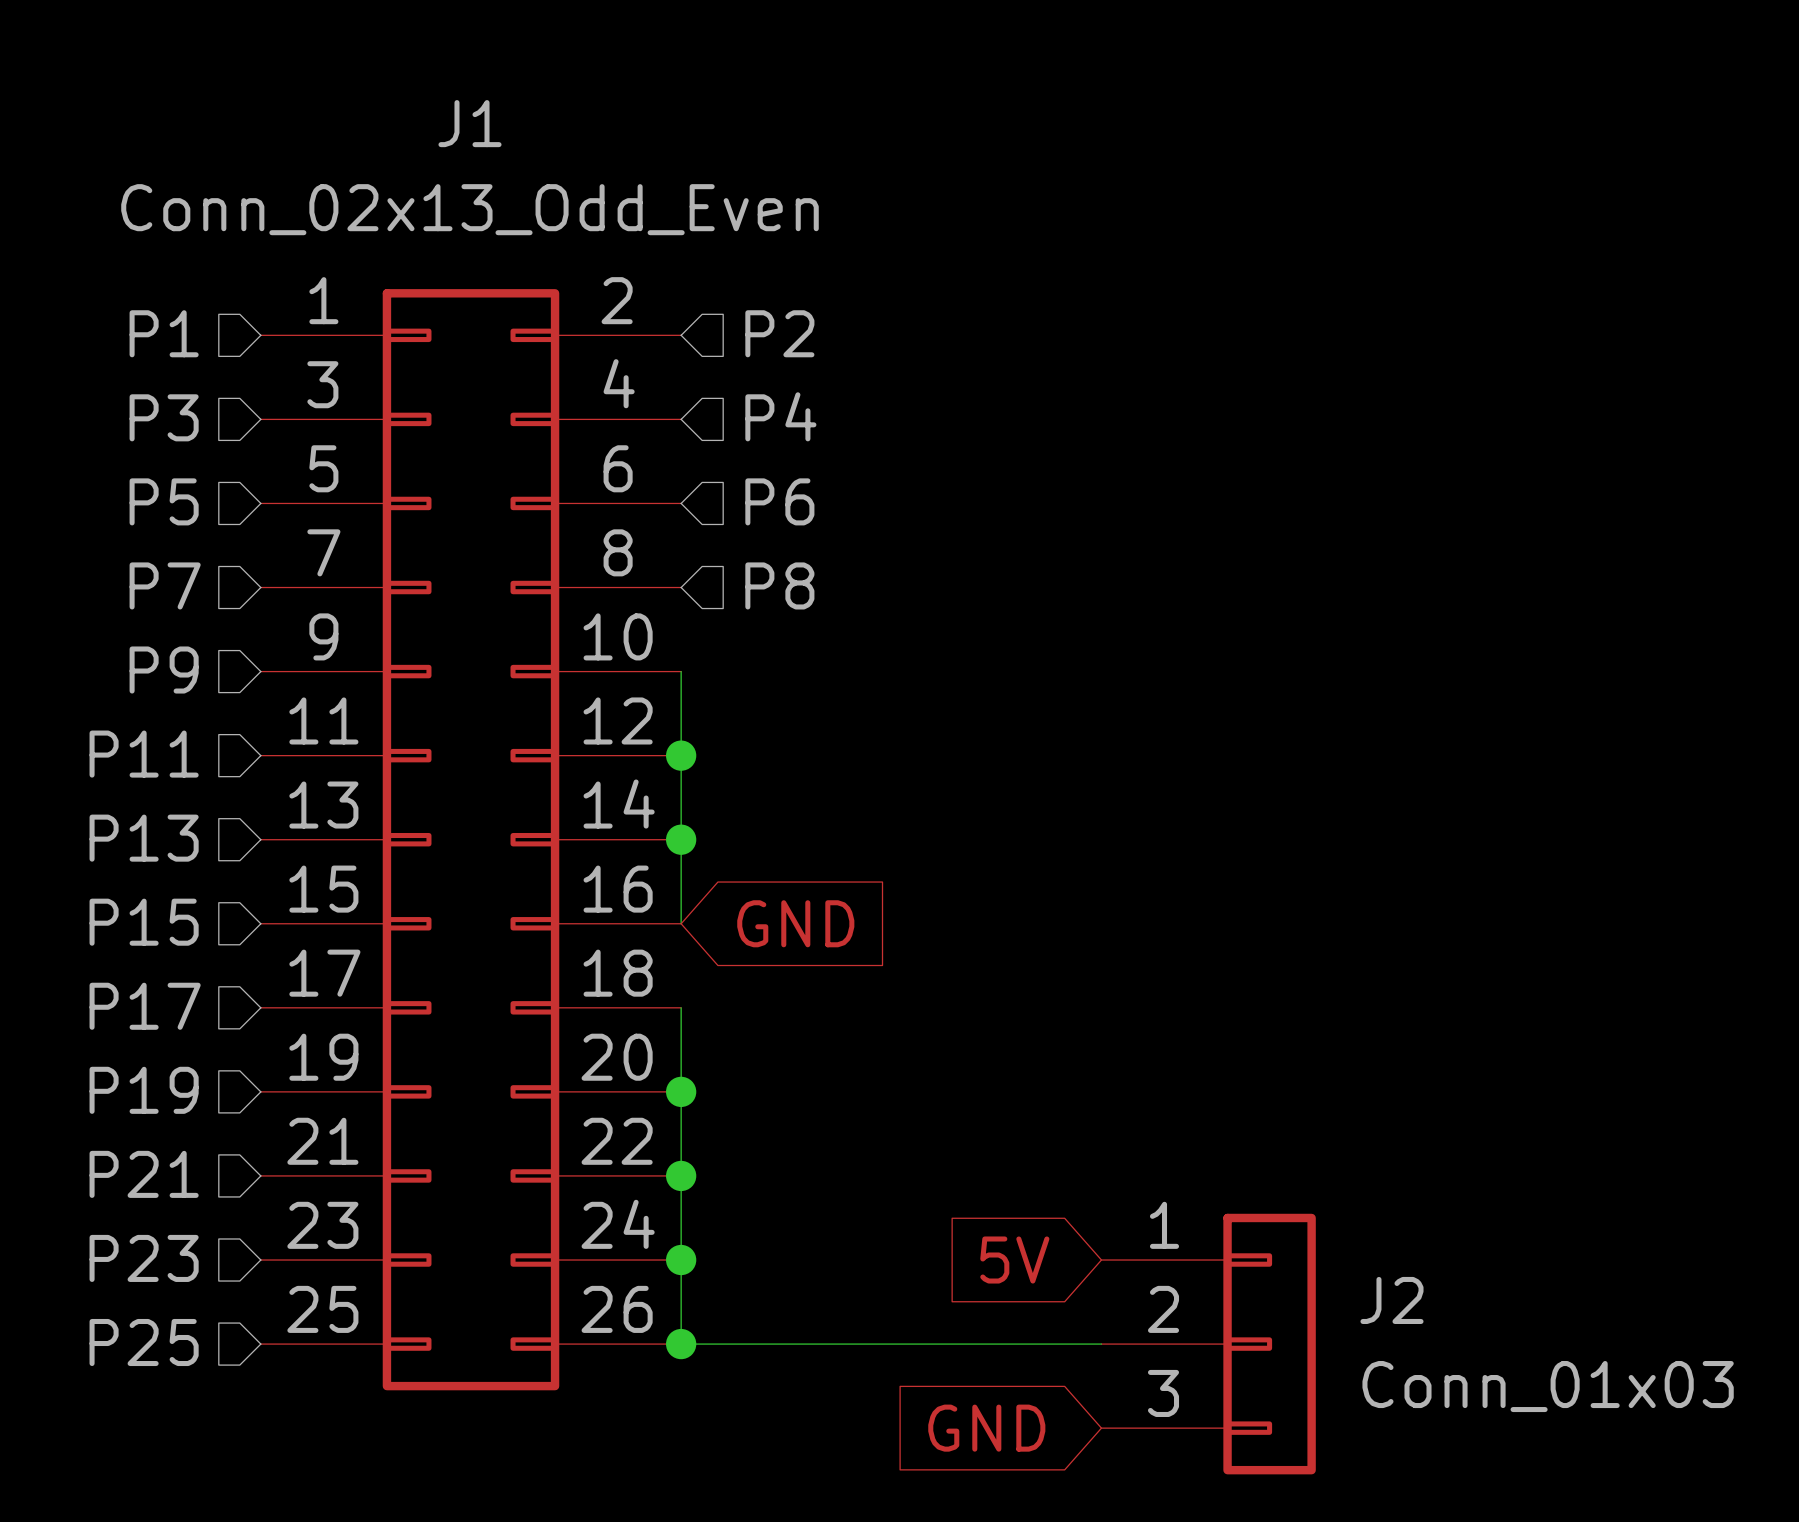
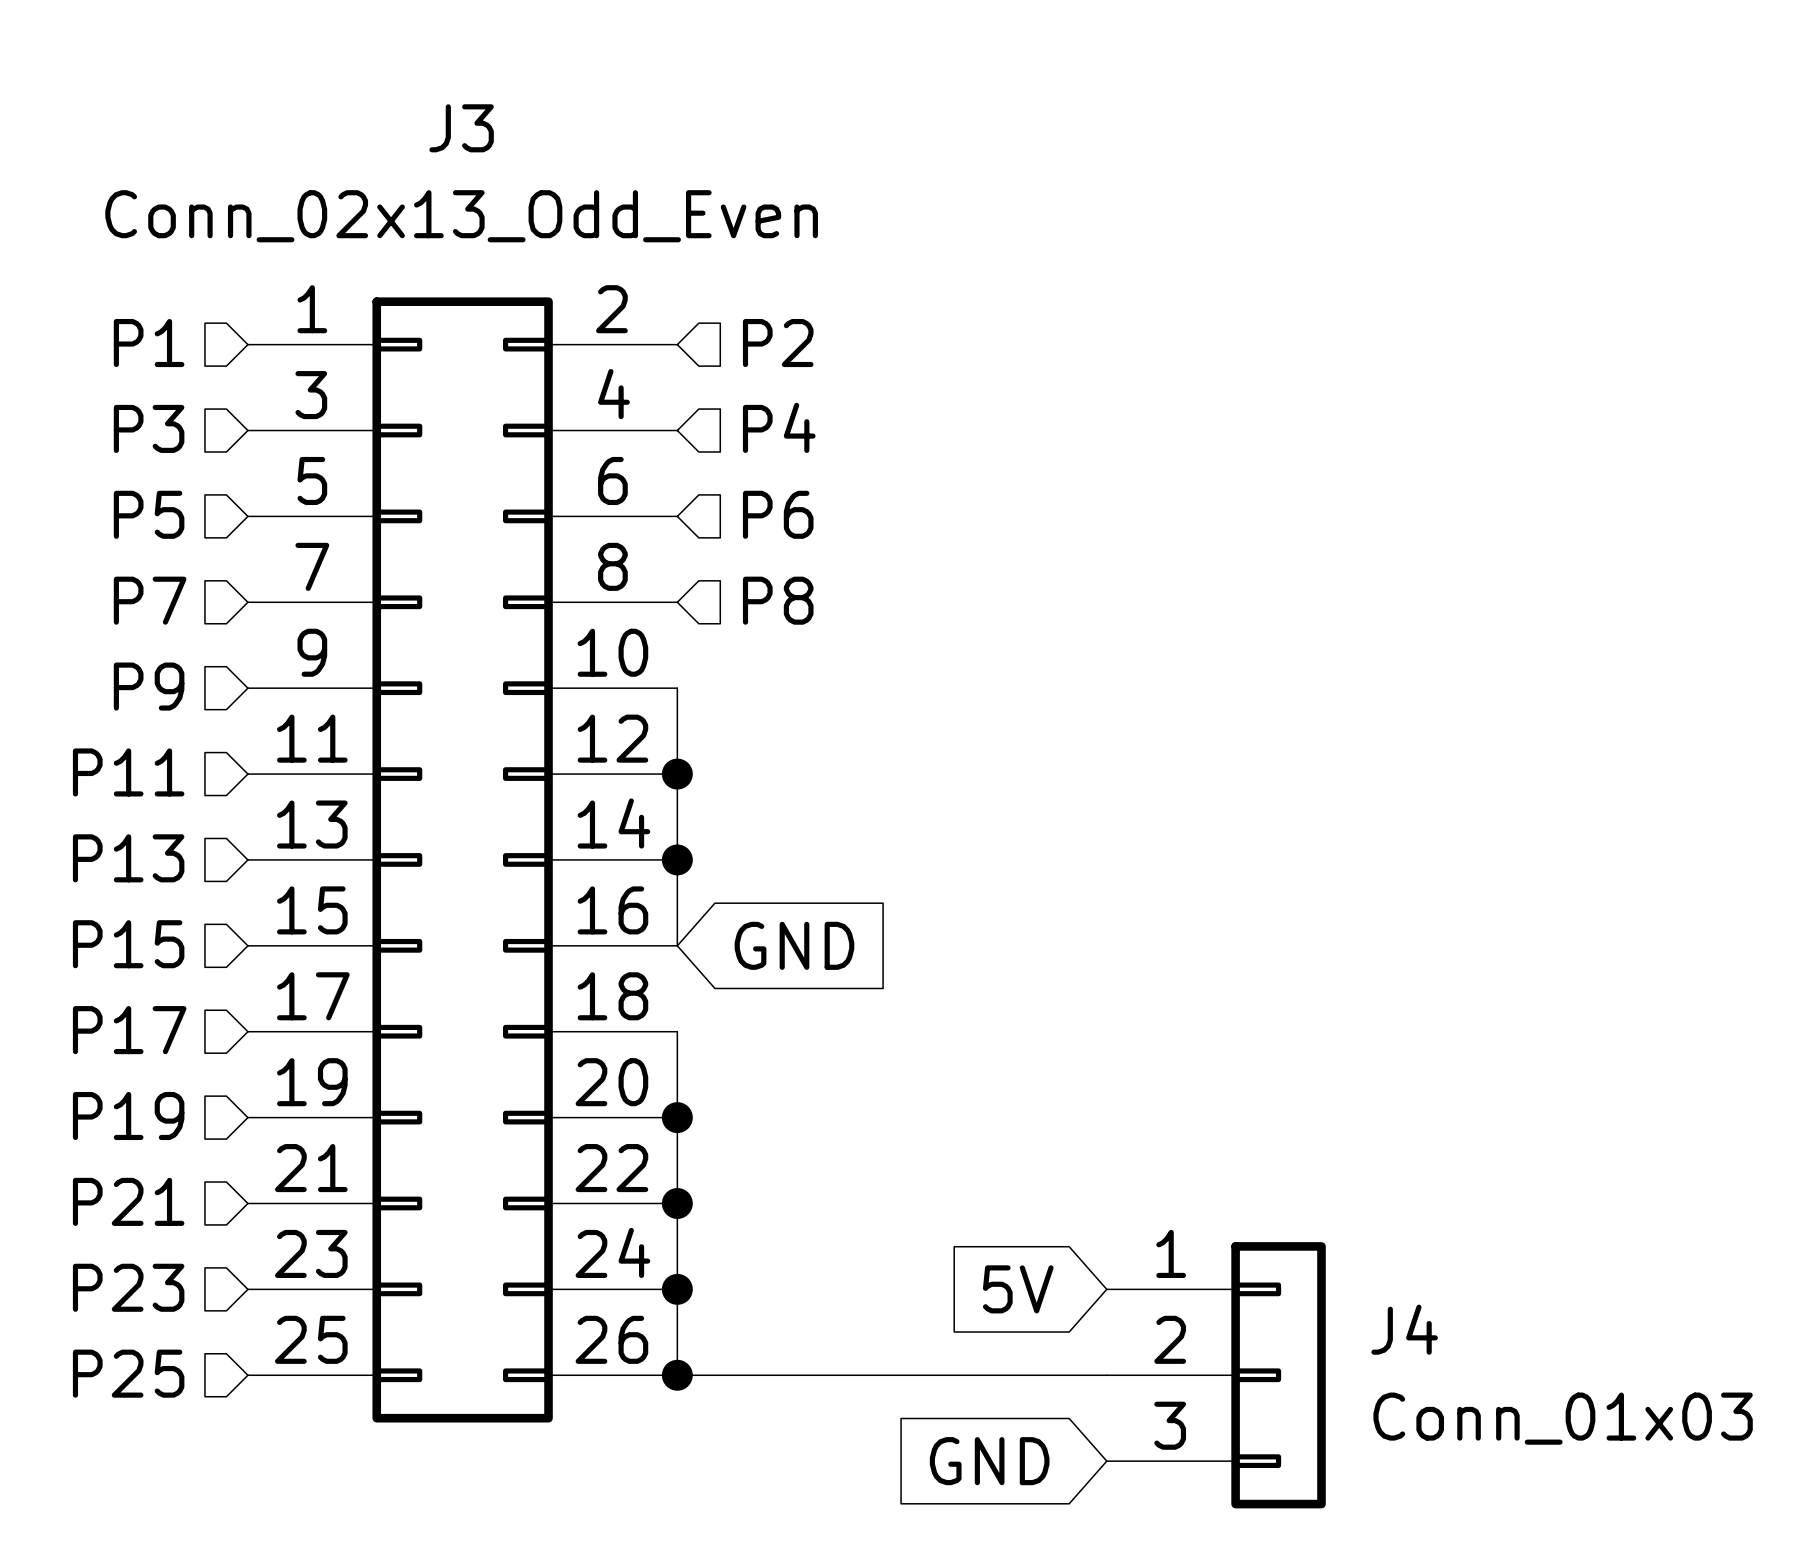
J1 name: J1 (469, 123) -> J3 (461, 128)
J2 name: J2 (1391, 1300) -> J4 (1404, 1329)

